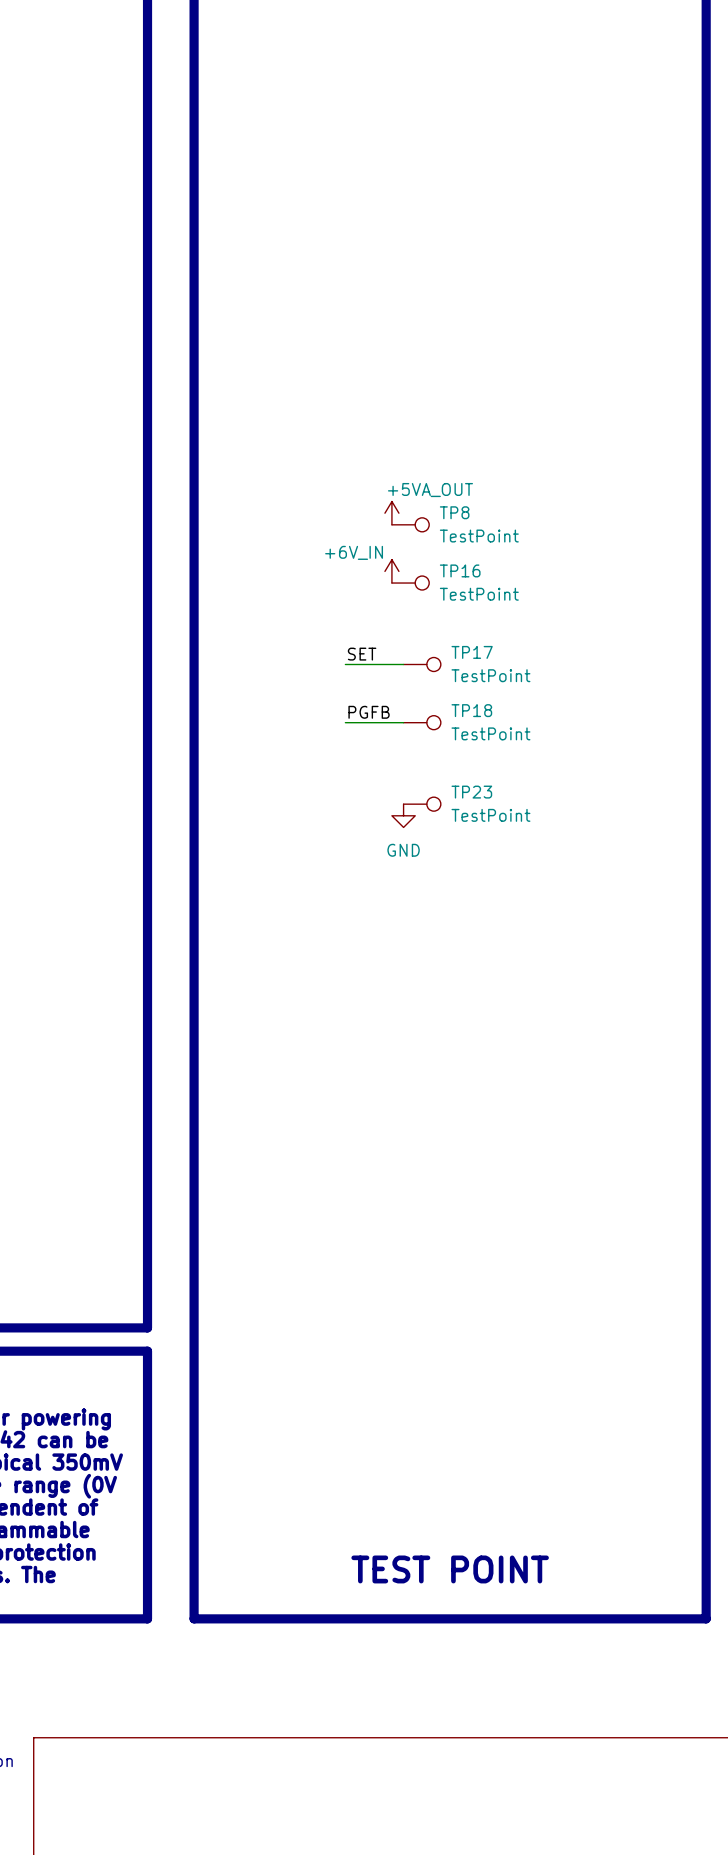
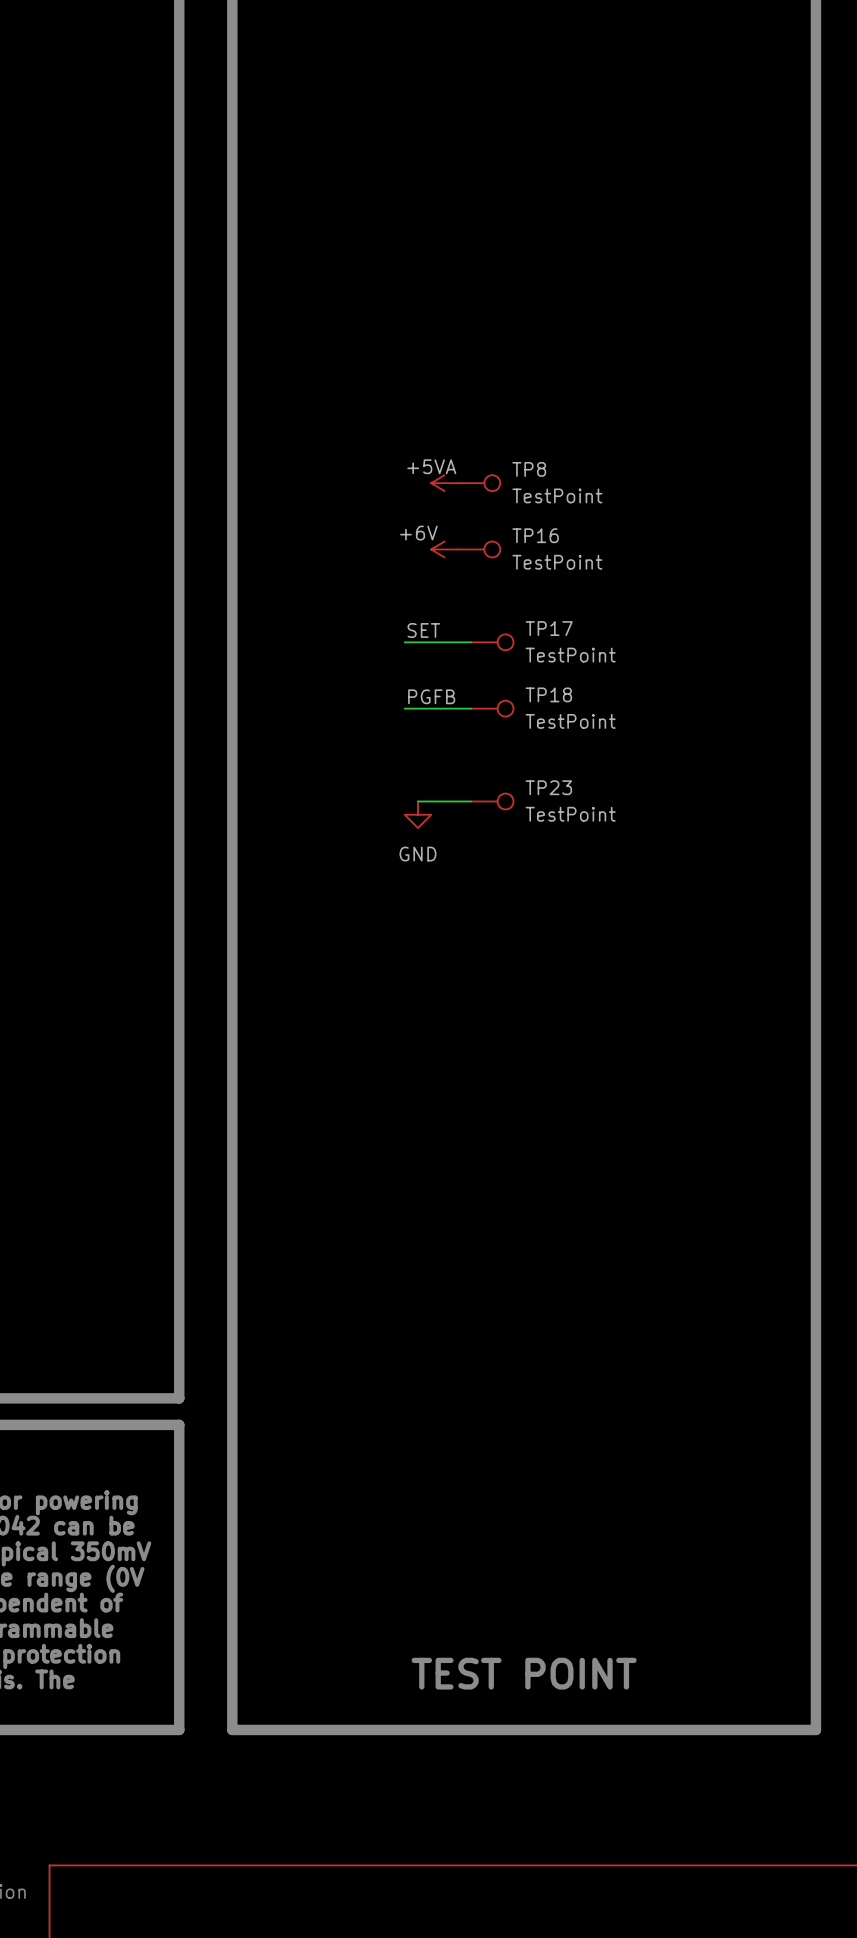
power symbol: +5VA_OUT (391, 513) -> none
power symbol: none -> +5VA (444, 483)
power symbol: +6V_IN (391, 571) -> none
power symbol: none -> +6V (444, 549)
wire: none -> (418, 801) (471, 801)
power symbol position: GND (403, 815) -> GND (418, 814)

